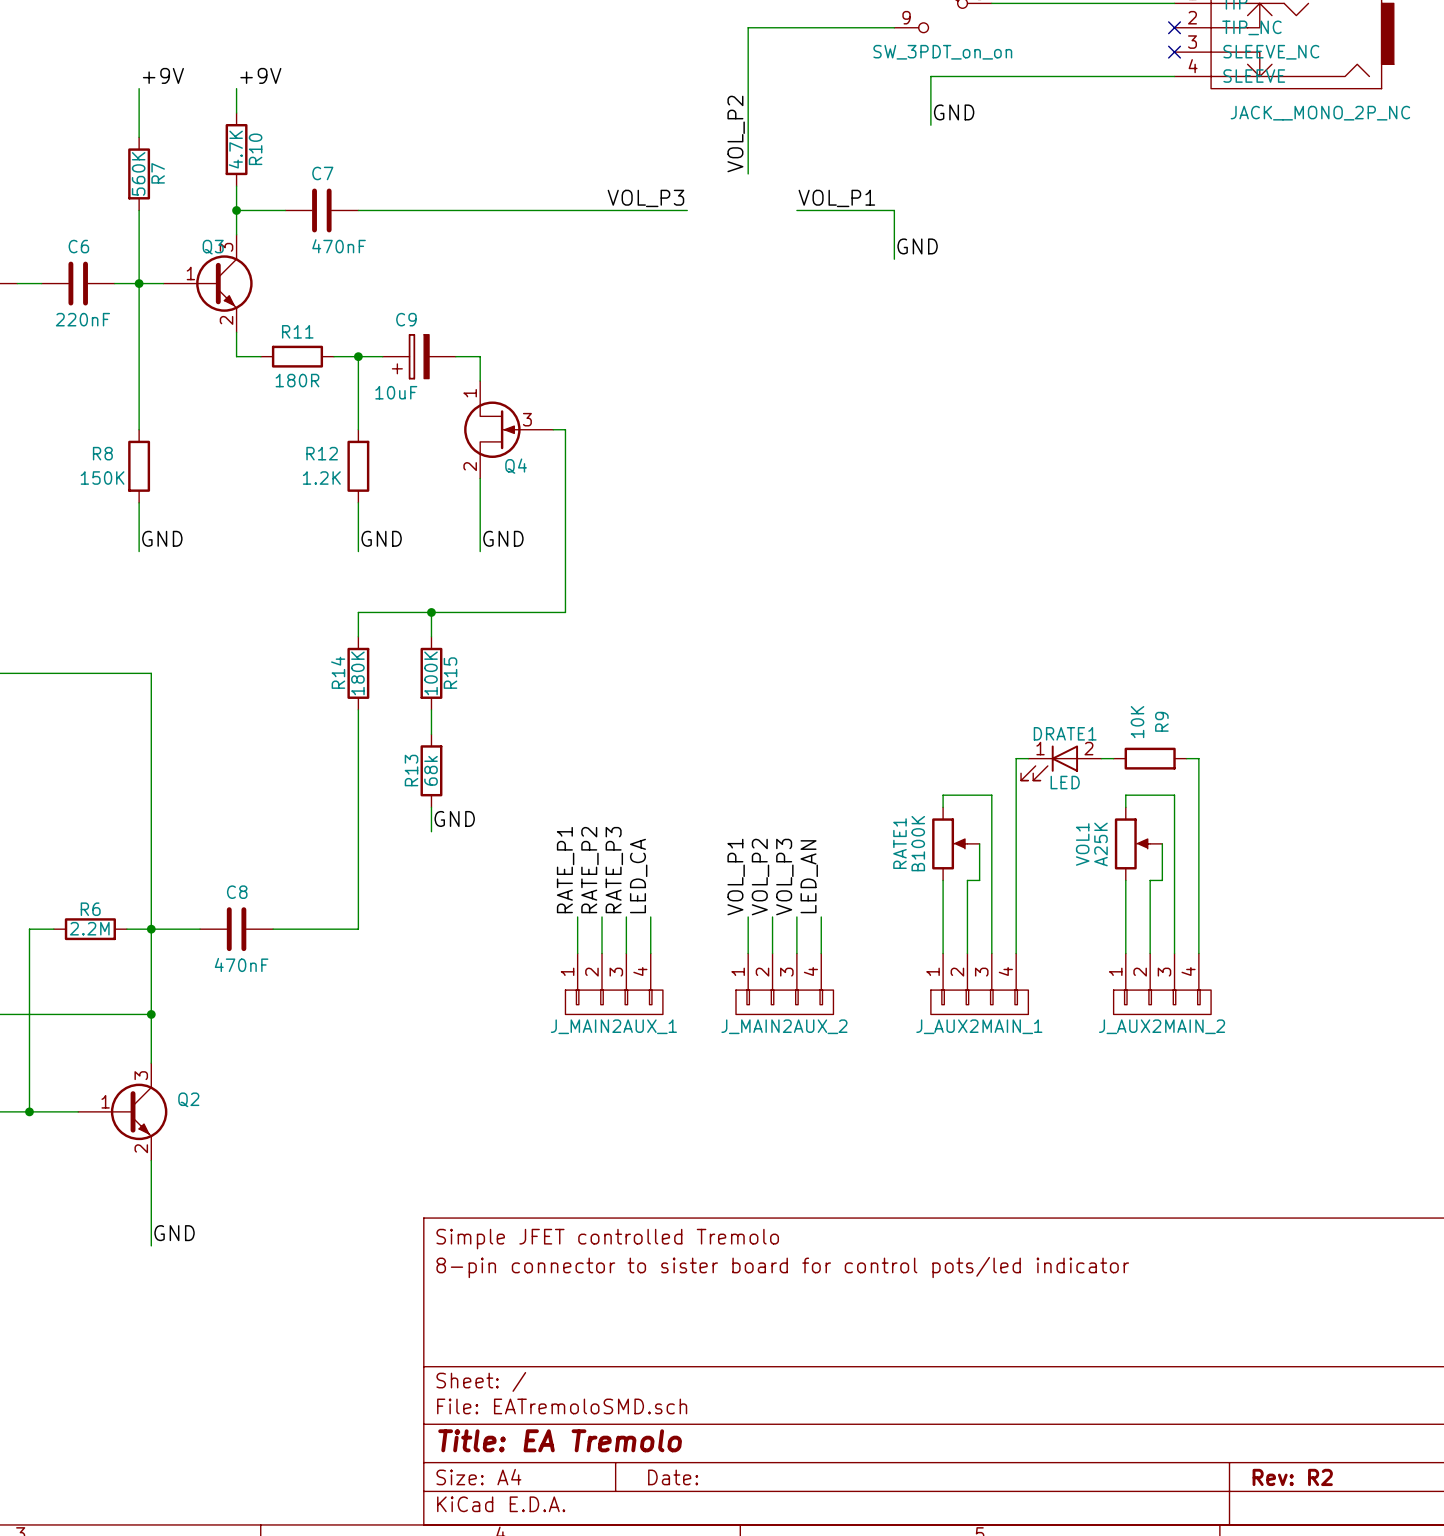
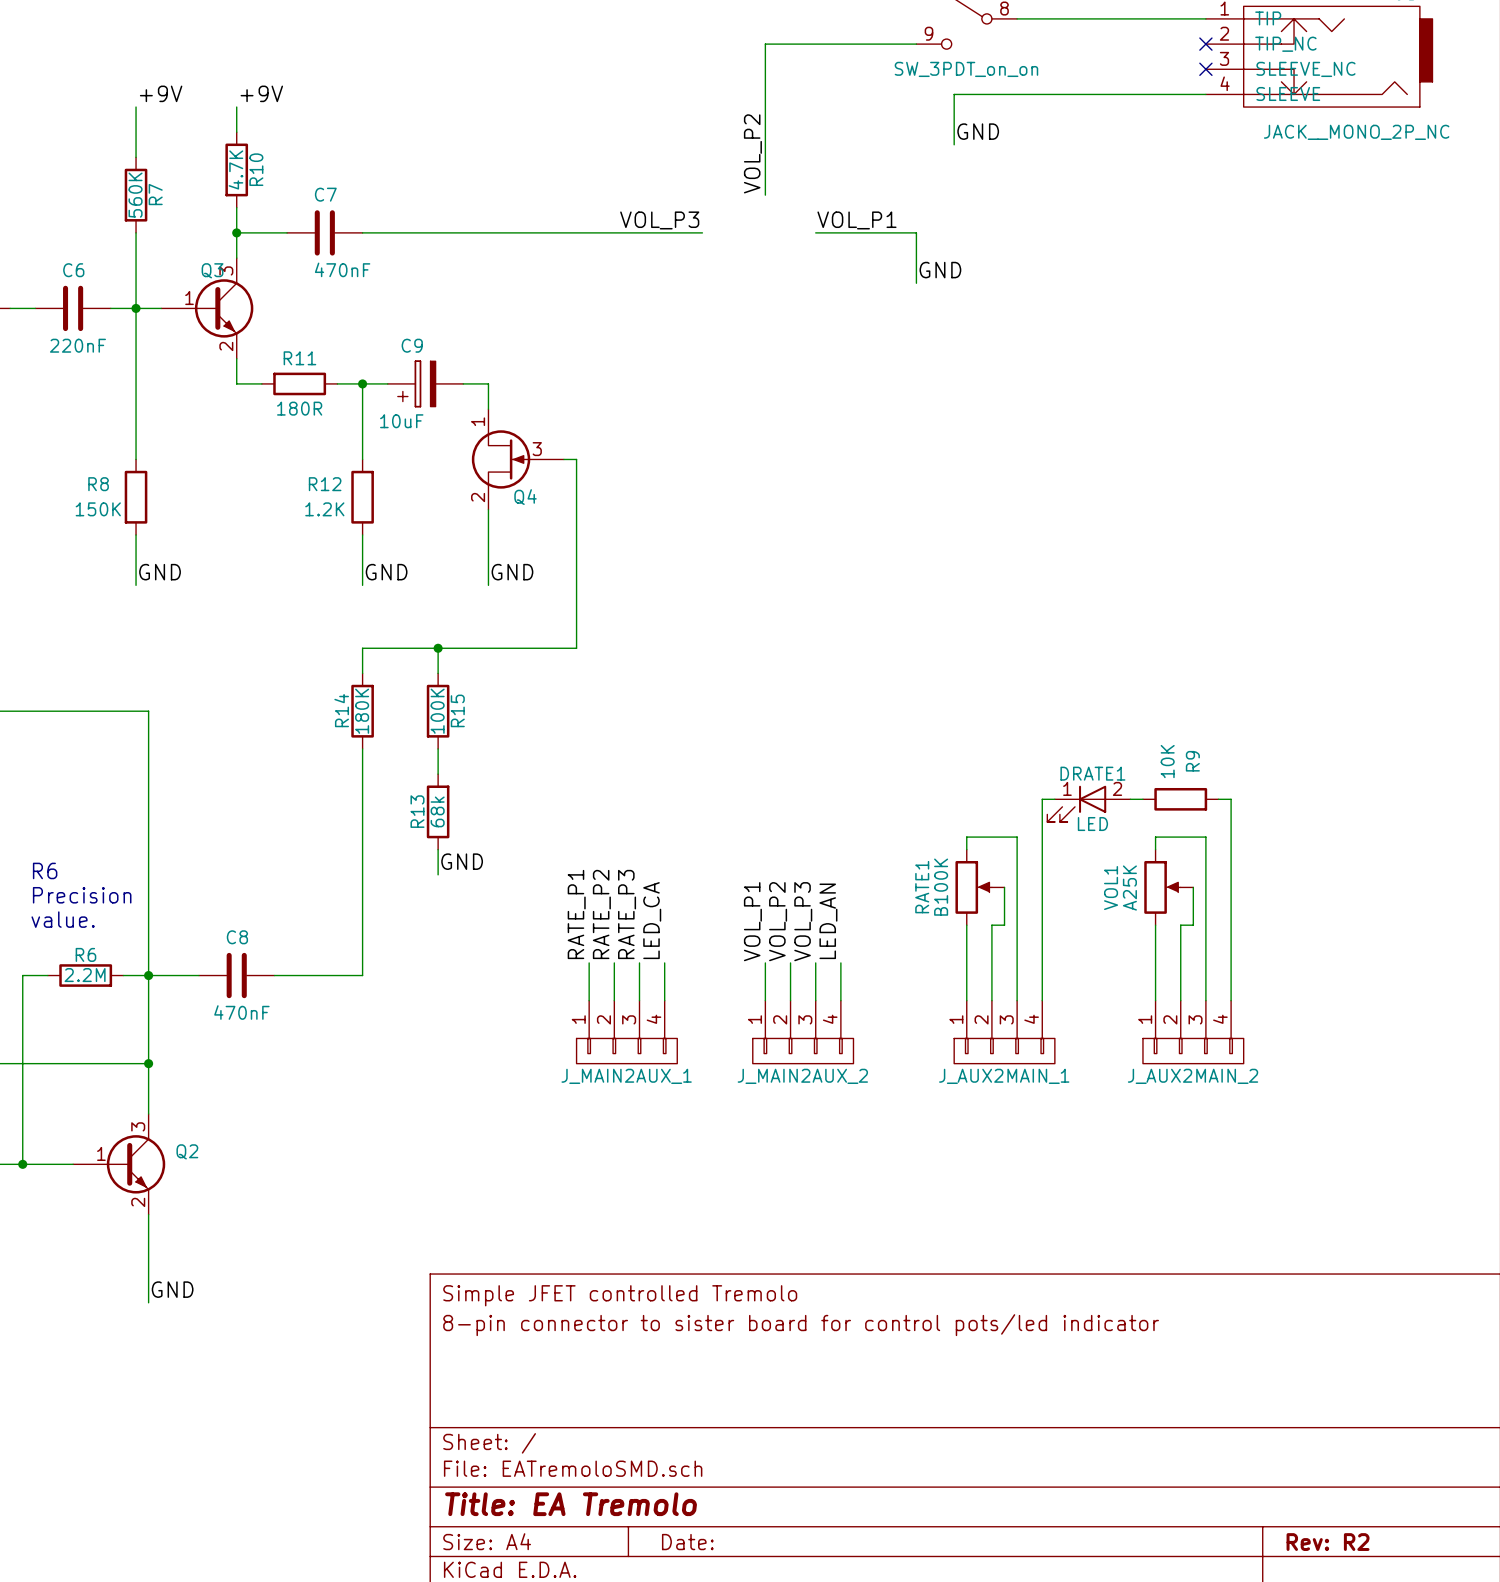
text: none -> R6 (45, 870)
text: none -> Precision (82, 895)
text: none -> value. (63, 919)

